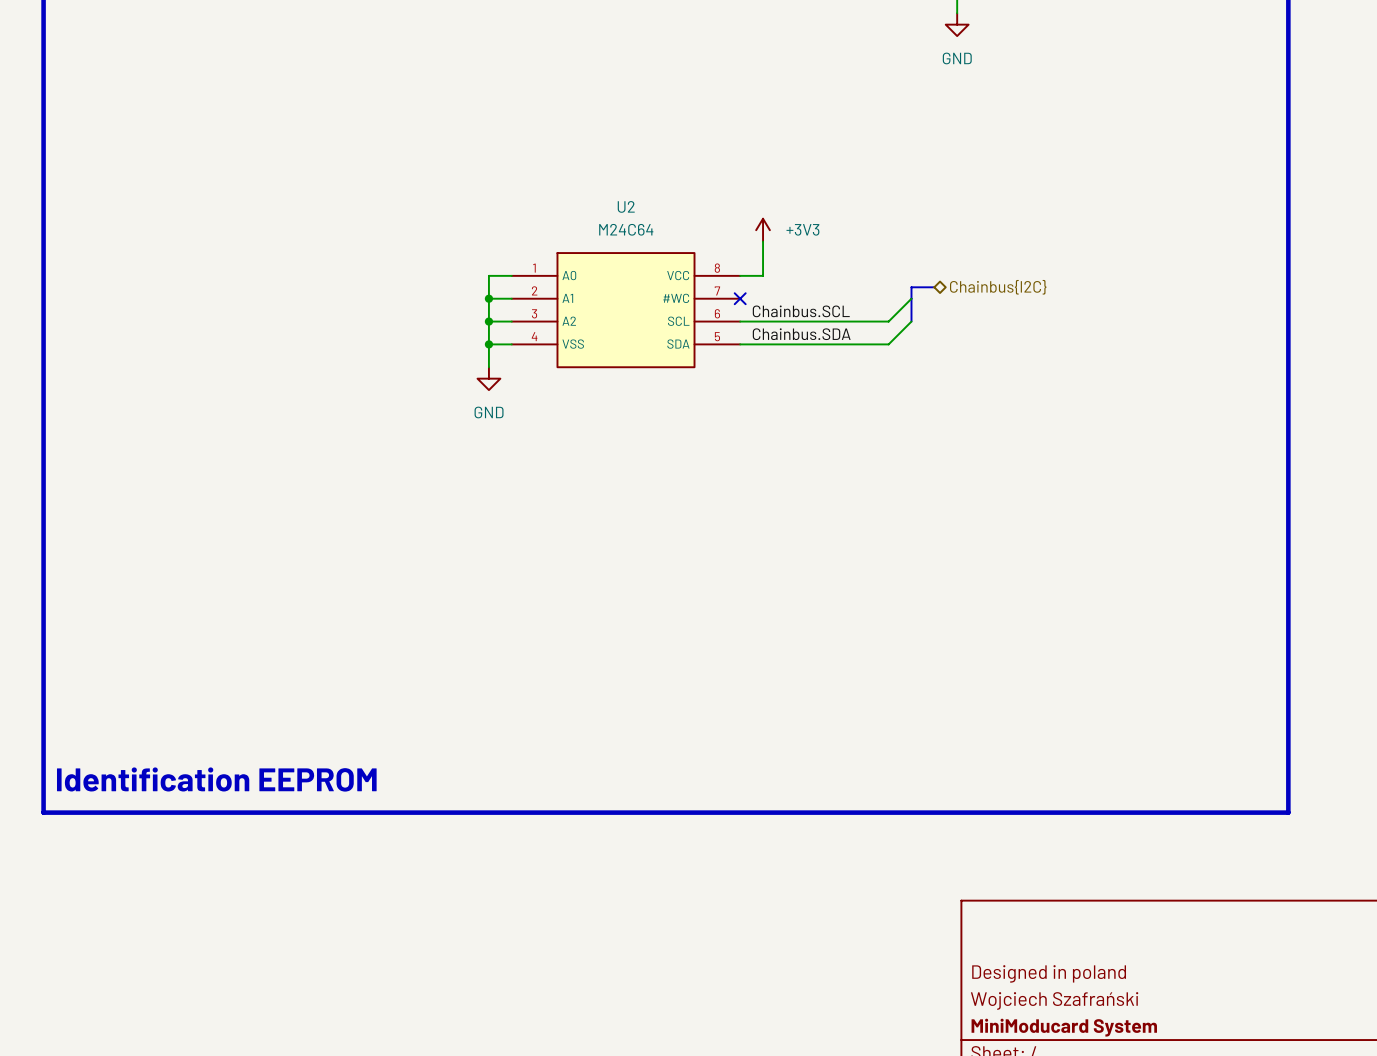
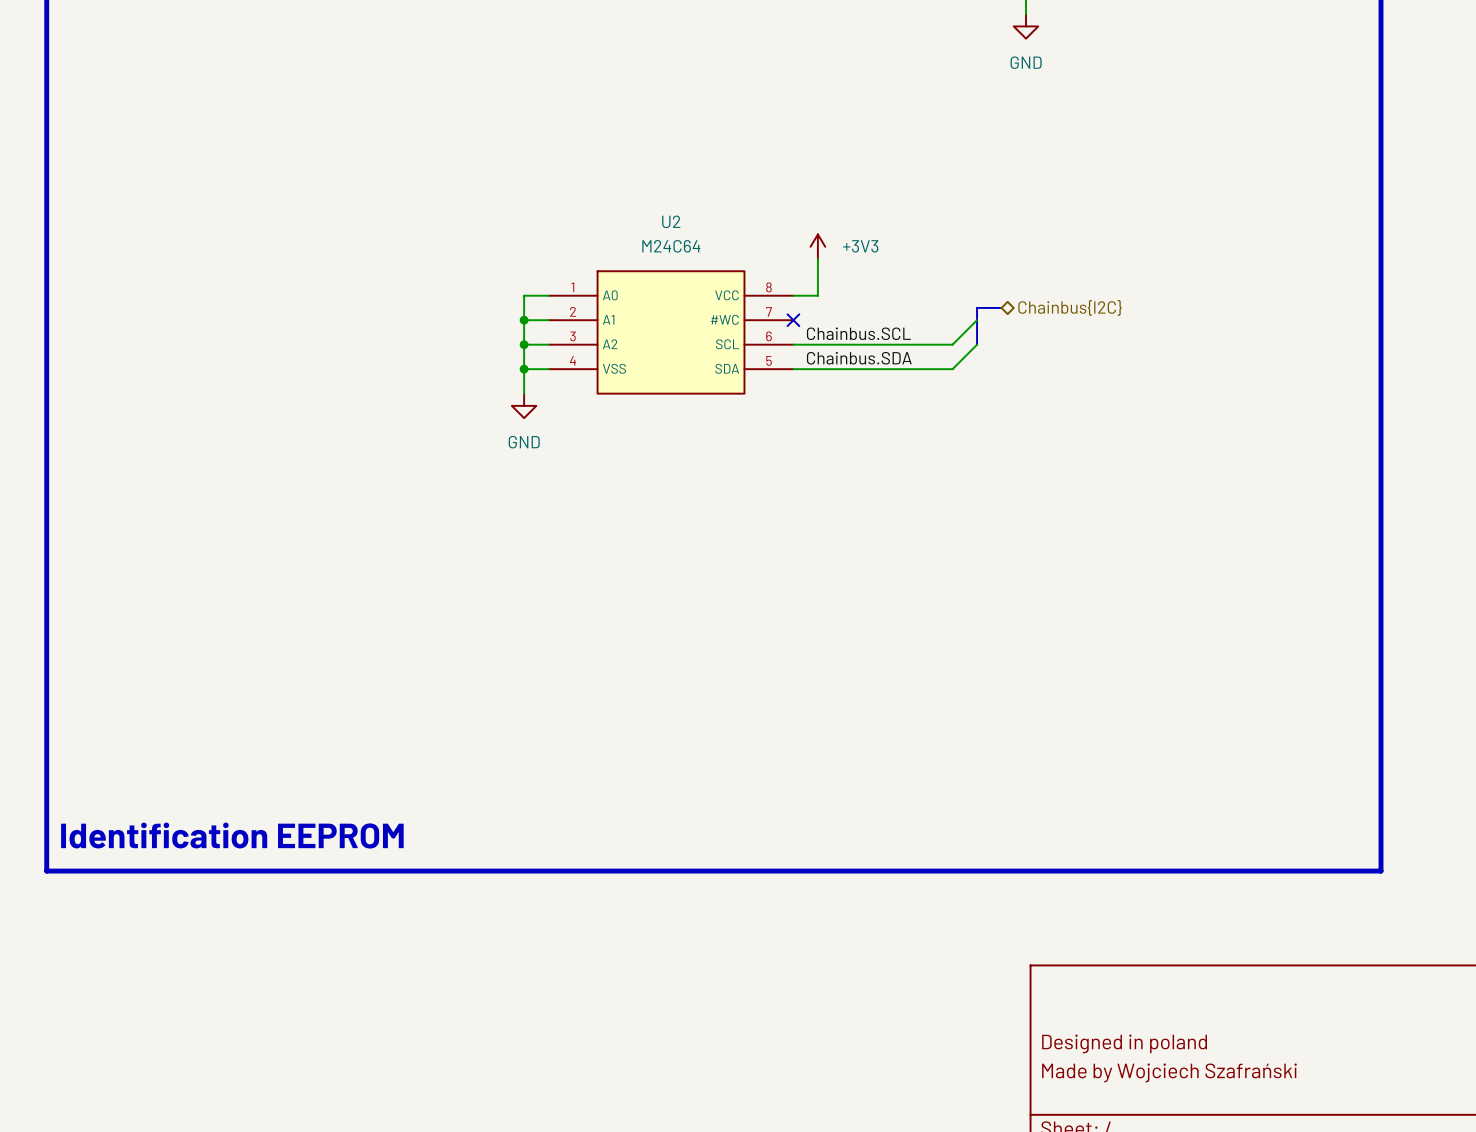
title block: Wojciech Szafrański (1054, 1000) -> Made by Wojciech Szafrański (1169, 1072)
title block: MiniModucard System (1064, 1027) -> none

